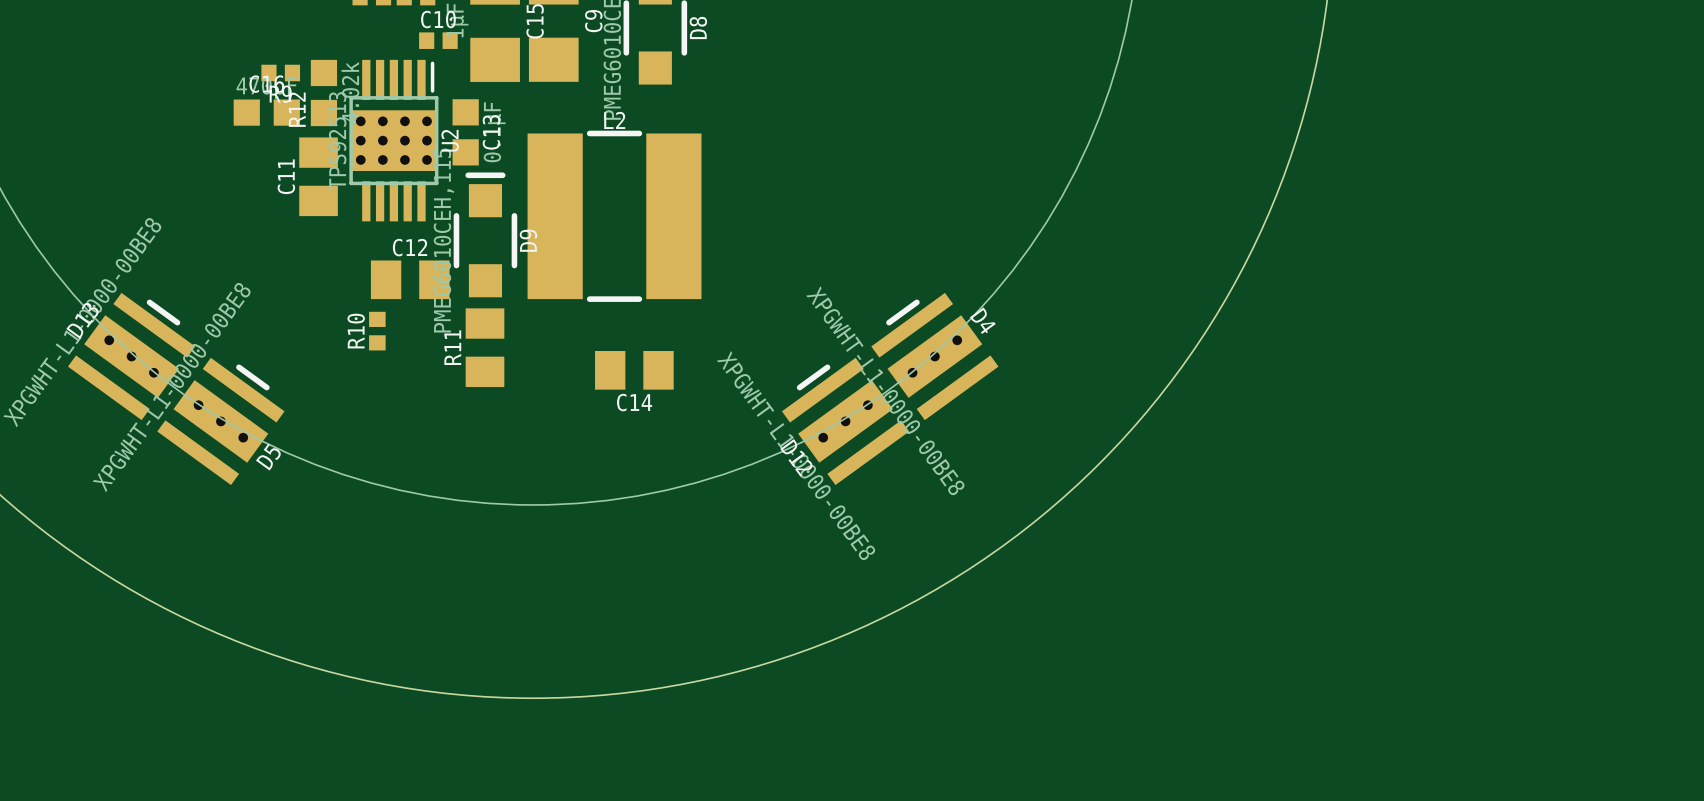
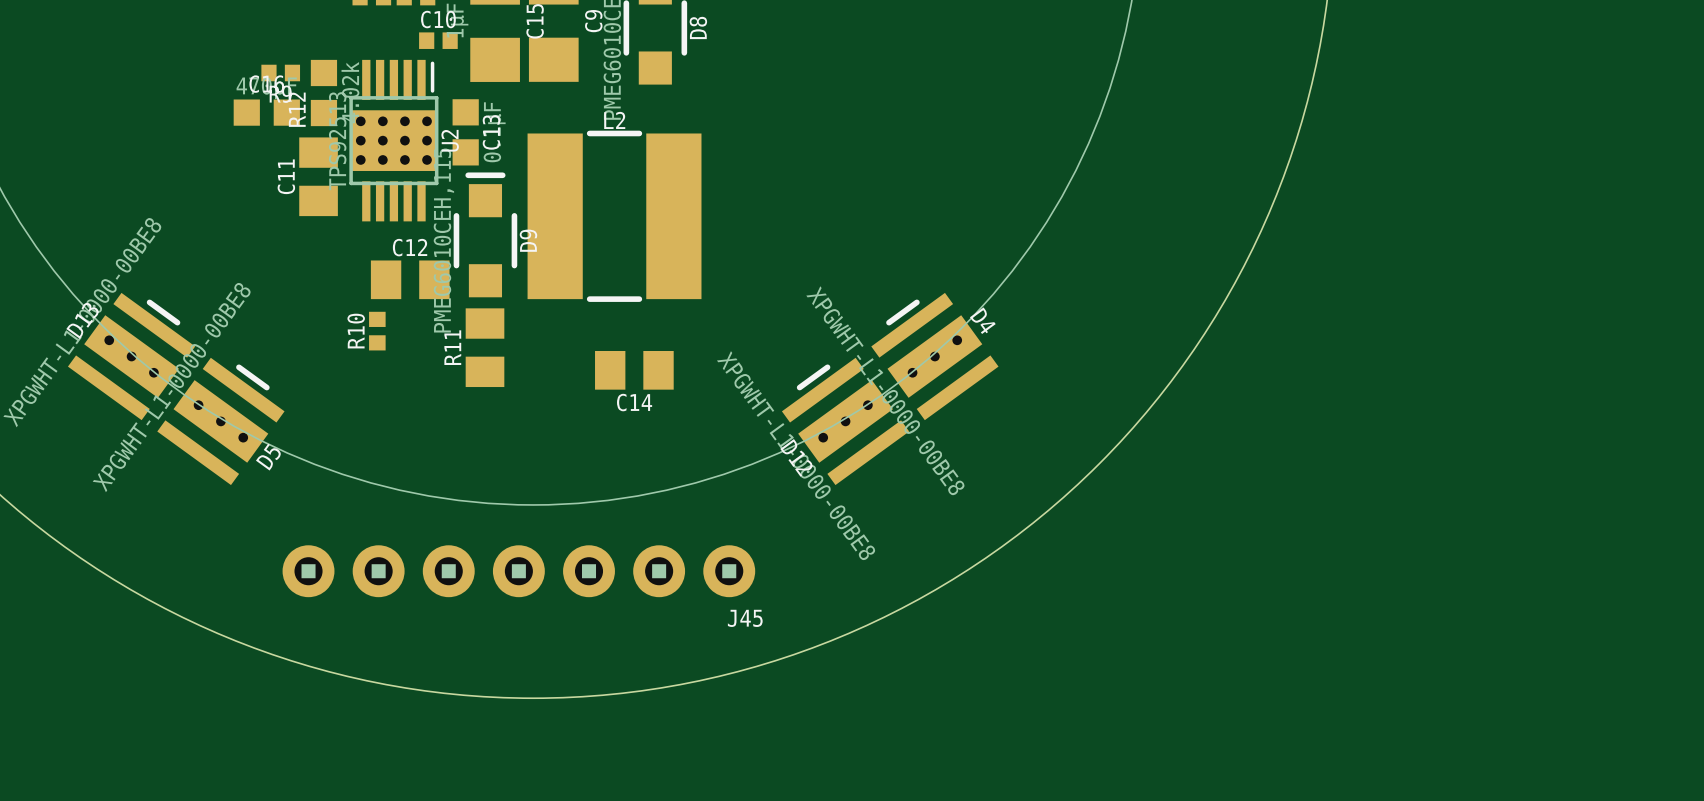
J45: none -> (518, 571)

